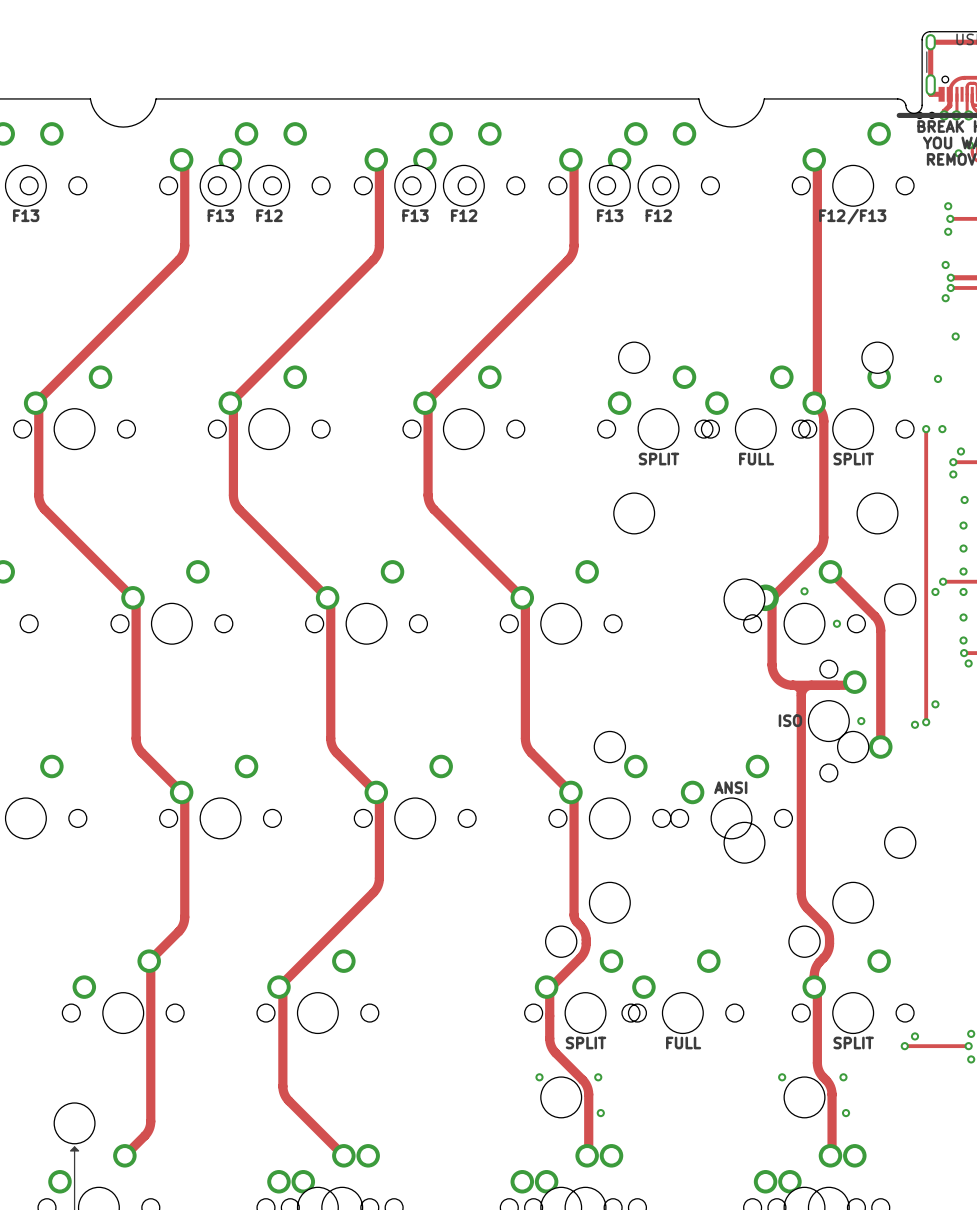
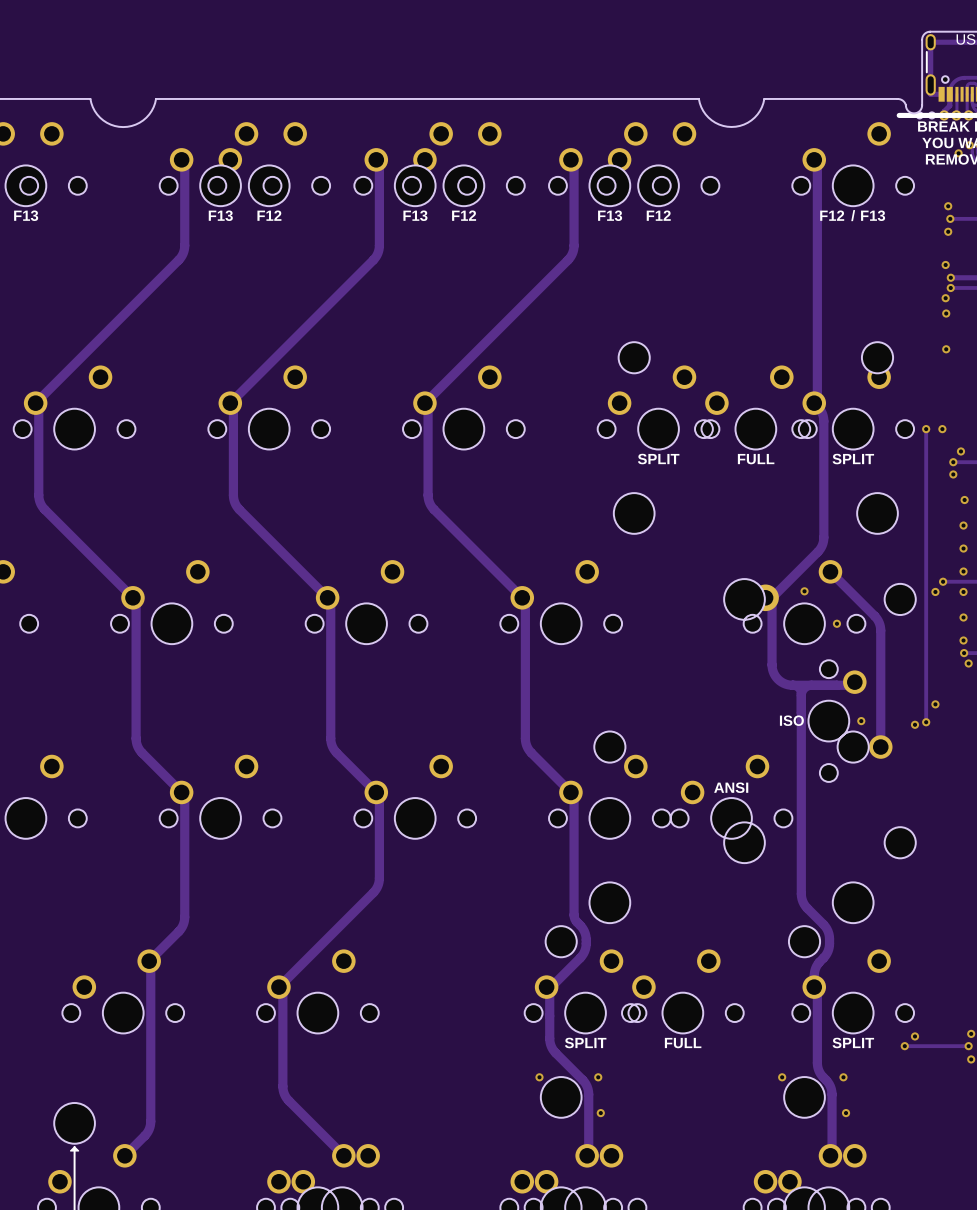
via: none -> (946, 313)
via: (955, 336) -> none
via: none -> (946, 349)
via: (938, 378) -> none

